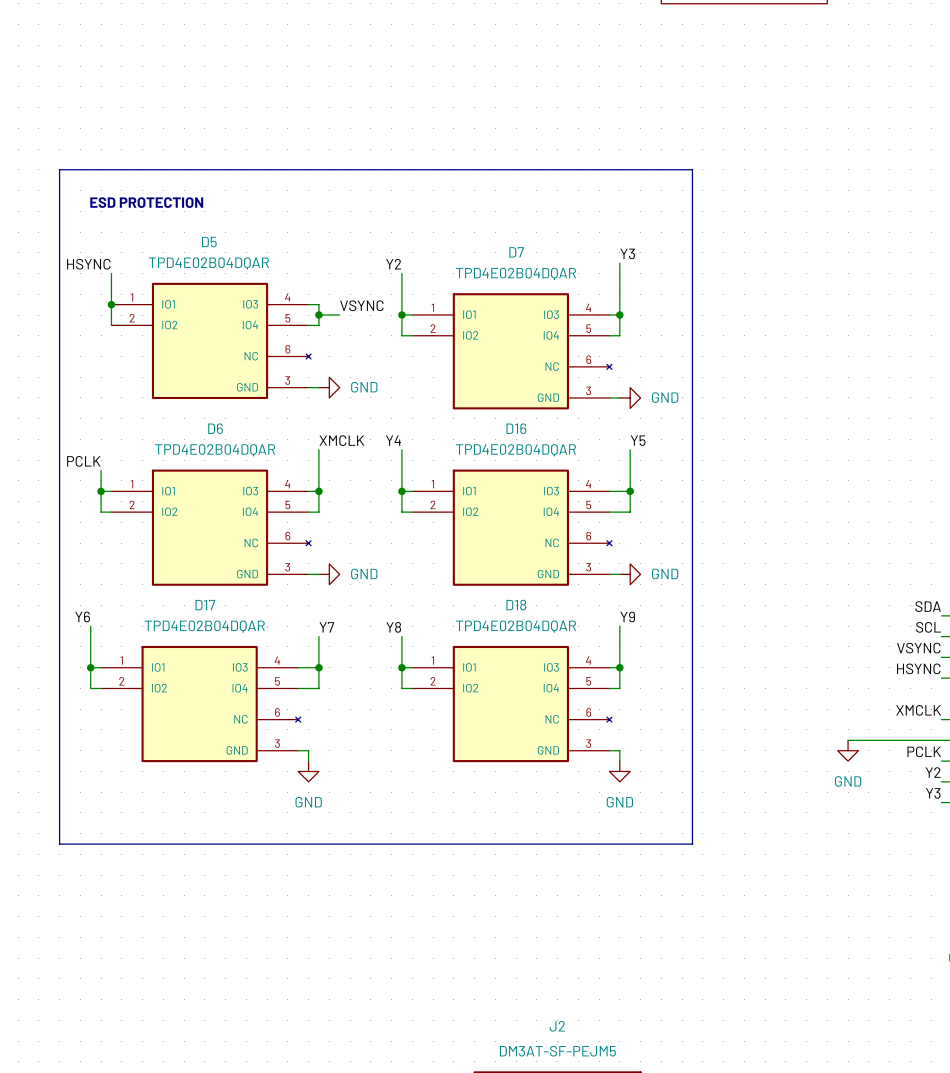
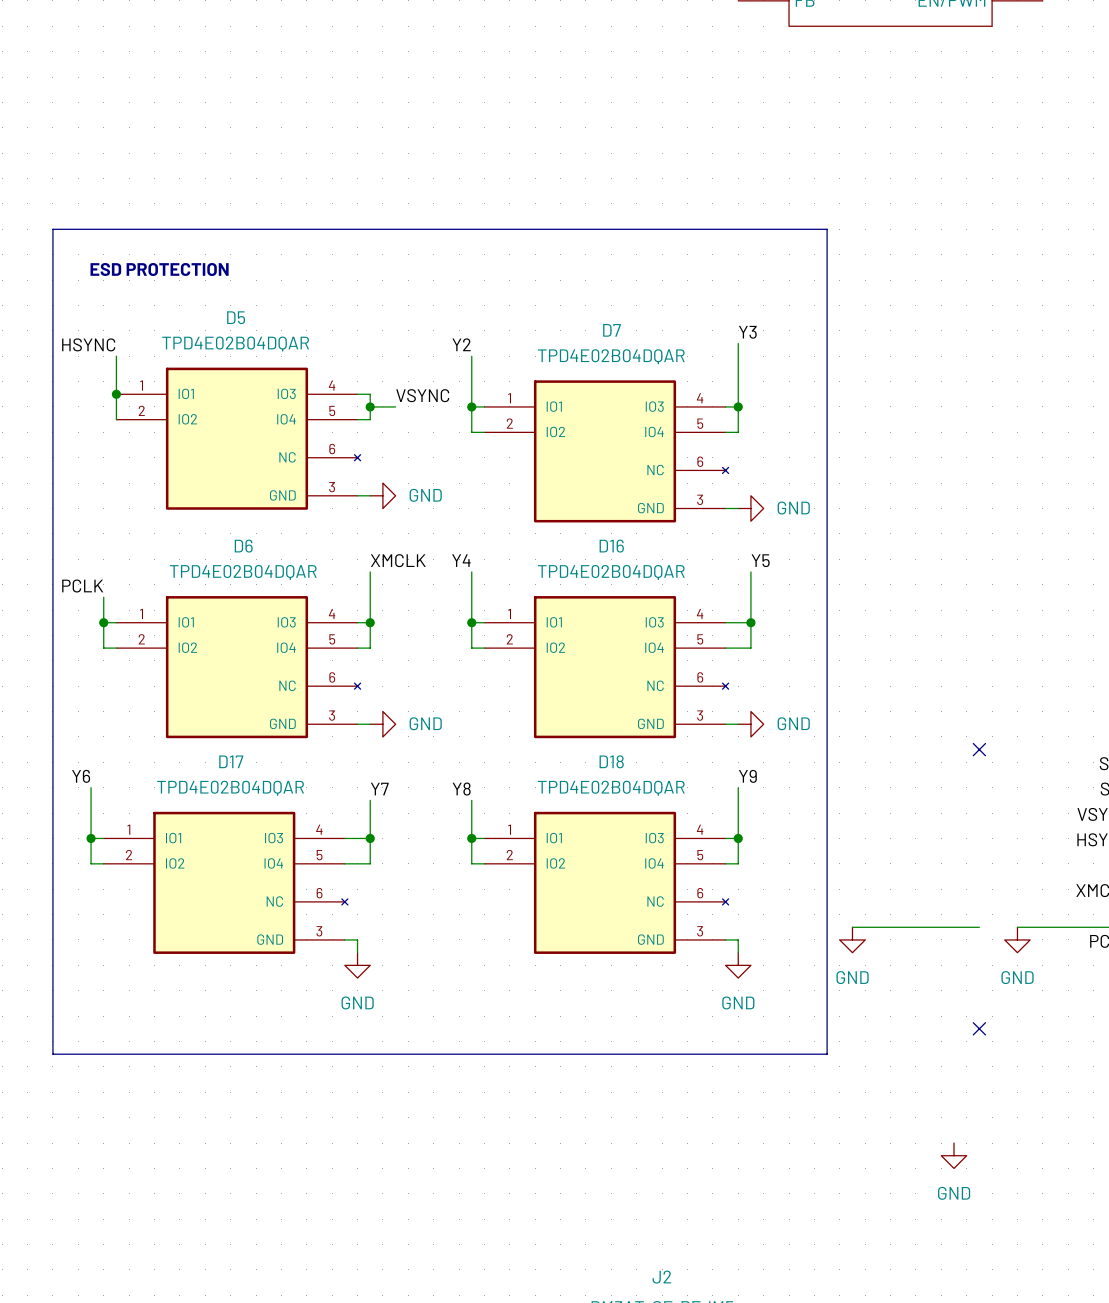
no-connect mark: none -> (979, 749)
wire: none -> (852, 927) (979, 927)
power symbol: none -> GND (852, 939)
no-connect mark: none -> (979, 1028)
power symbol: none -> GND (954, 1155)

